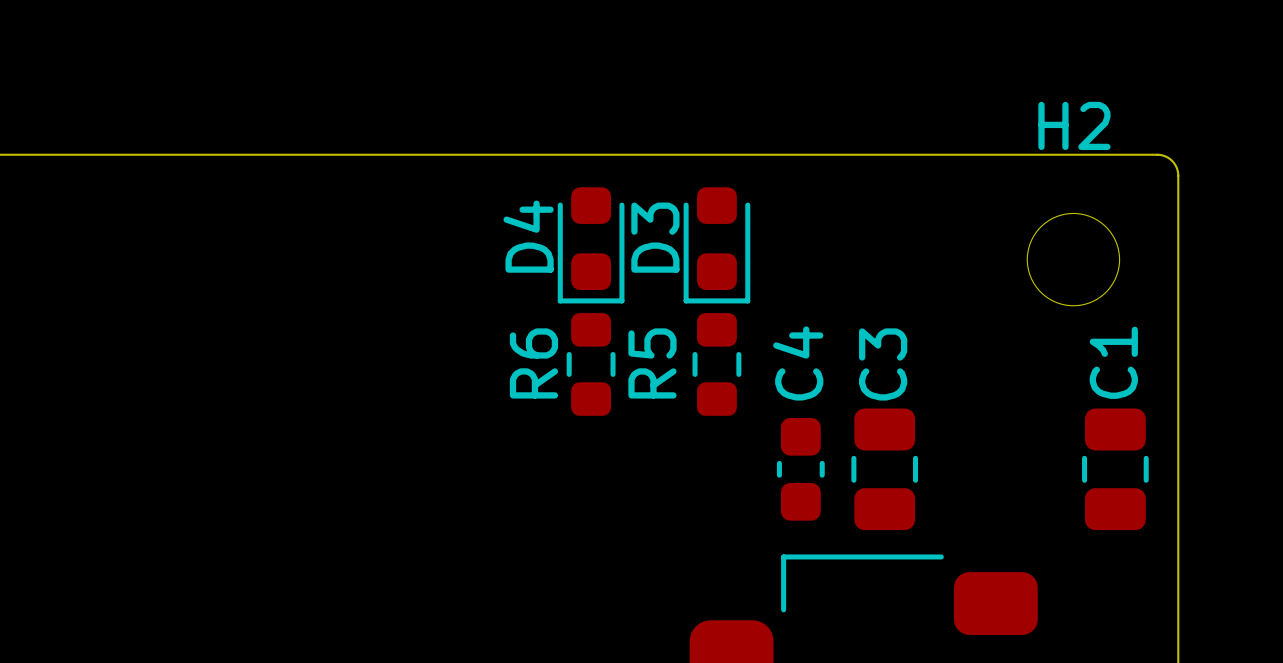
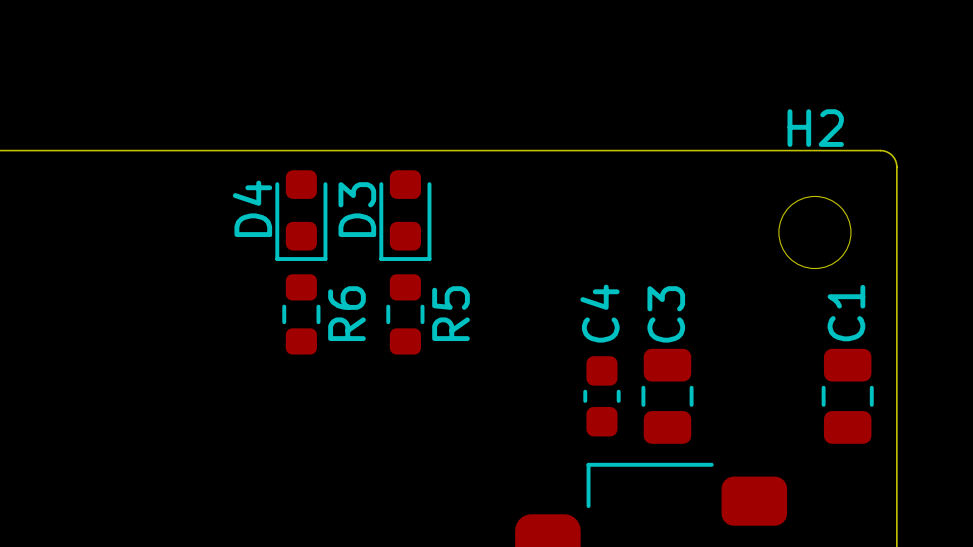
D4 position: (591, 245) -> (301, 215)
D3 position: (716, 245) -> (405, 215)
R6 name position: R6 (533, 363) -> R6 (346, 313)
R5 name position: R5 (652, 363) -> R5 (451, 313)
R6 position: (591, 364) -> (301, 314)
R5 position: (716, 364) -> (405, 314)

